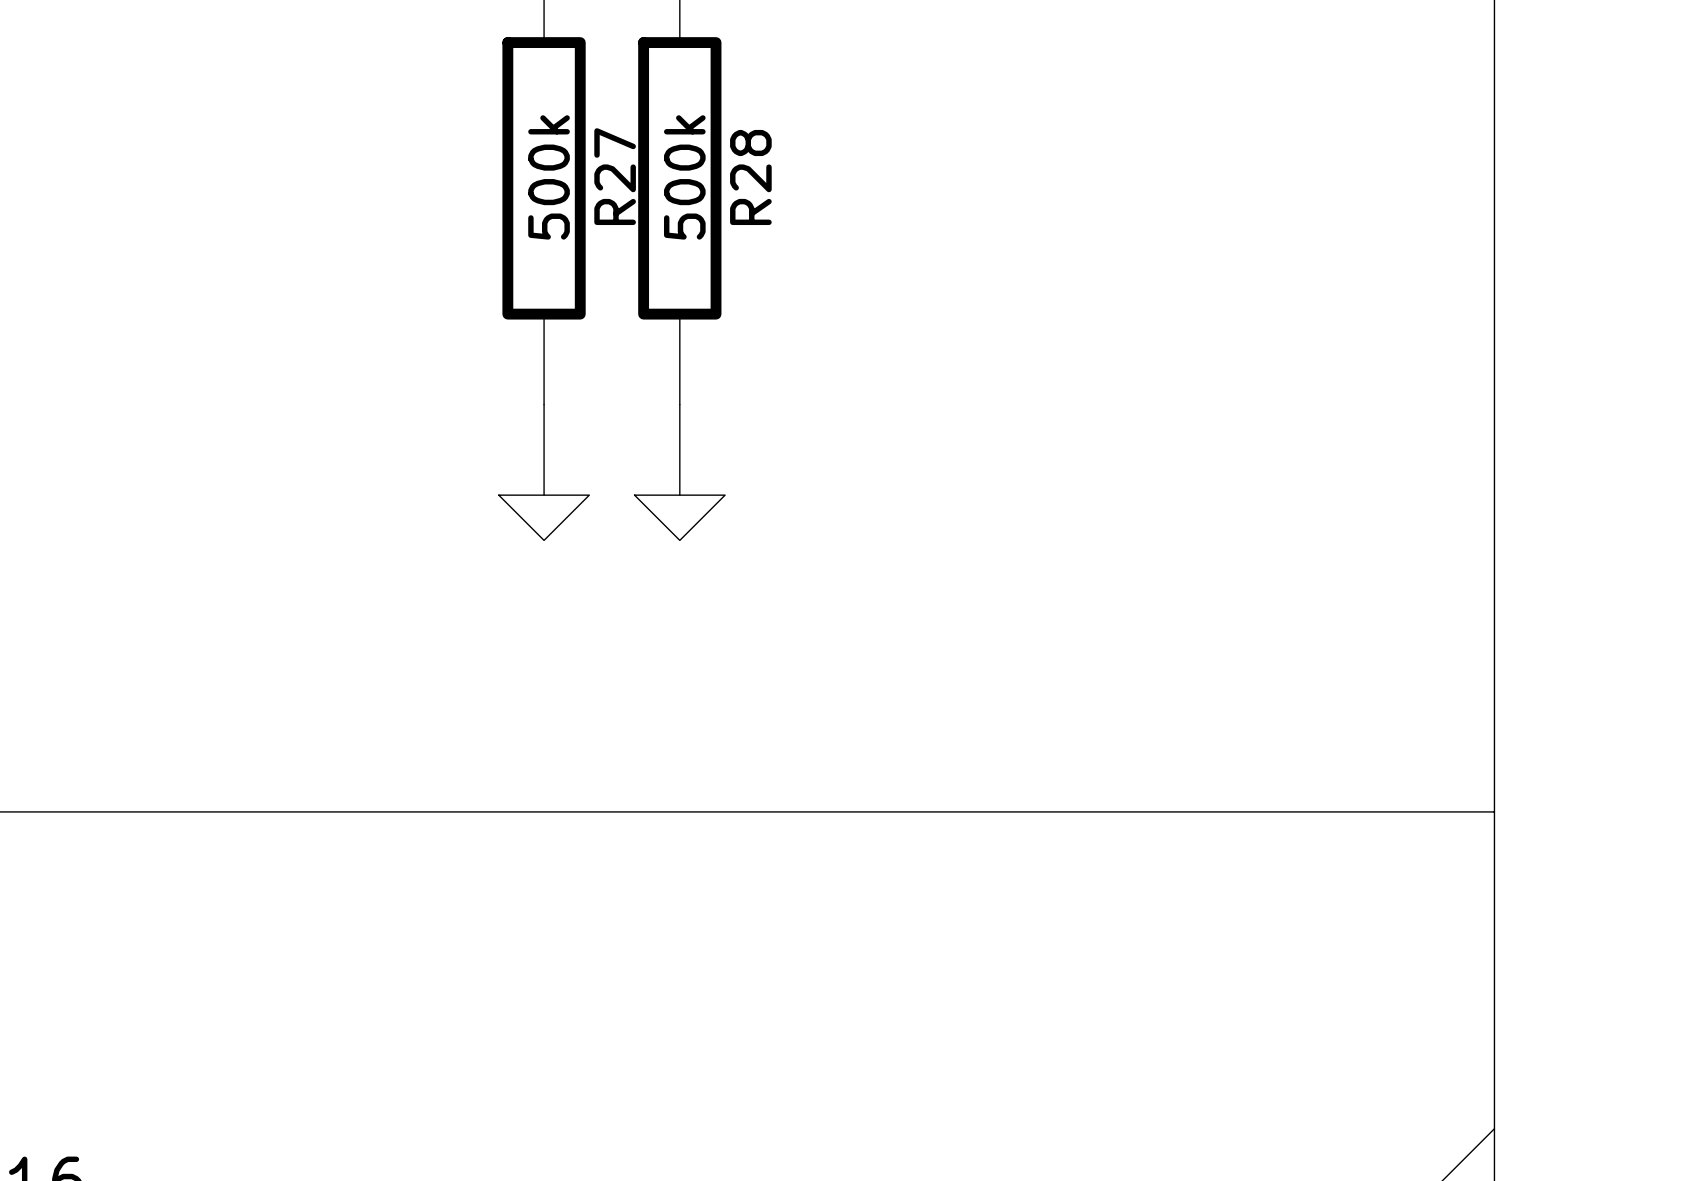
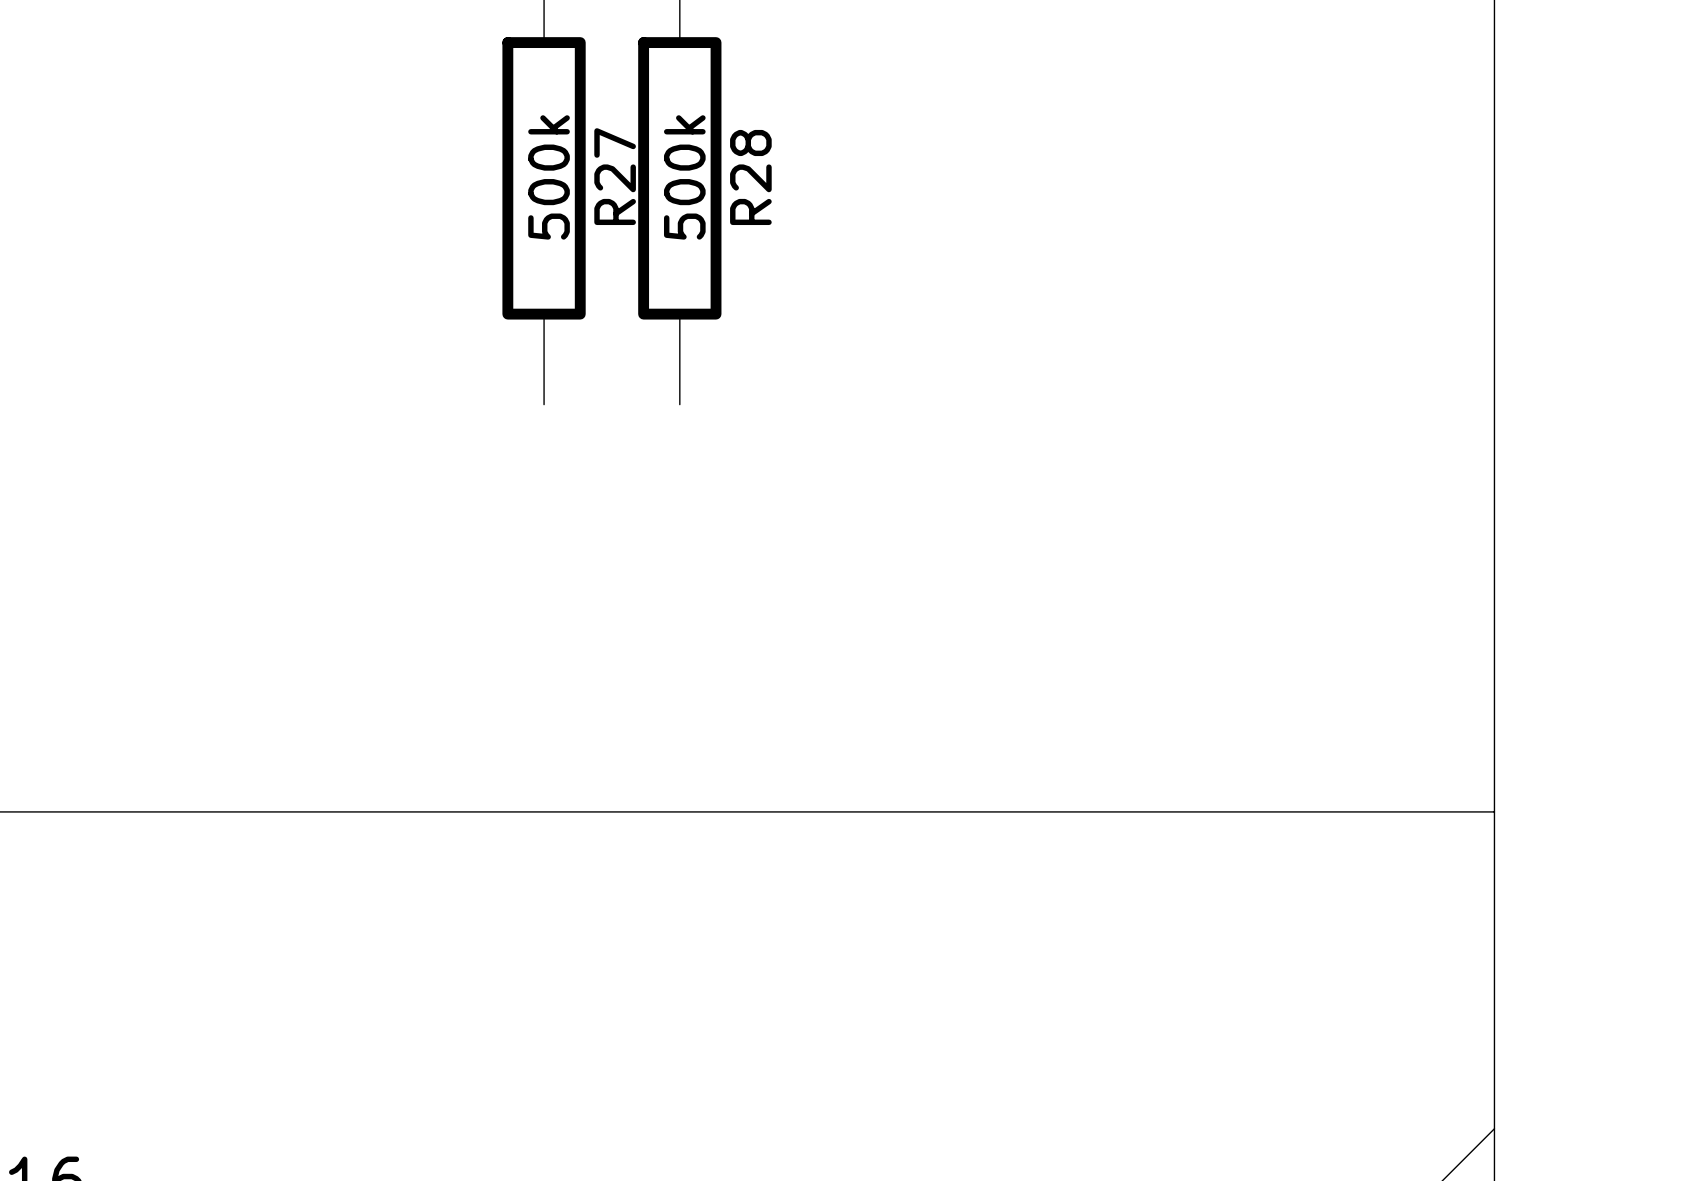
wire: (544, 404) (544, 495) -> none
wire: (679, 404) (679, 495) -> none
power symbol: (544, 517) -> none
power symbol: (679, 517) -> none

